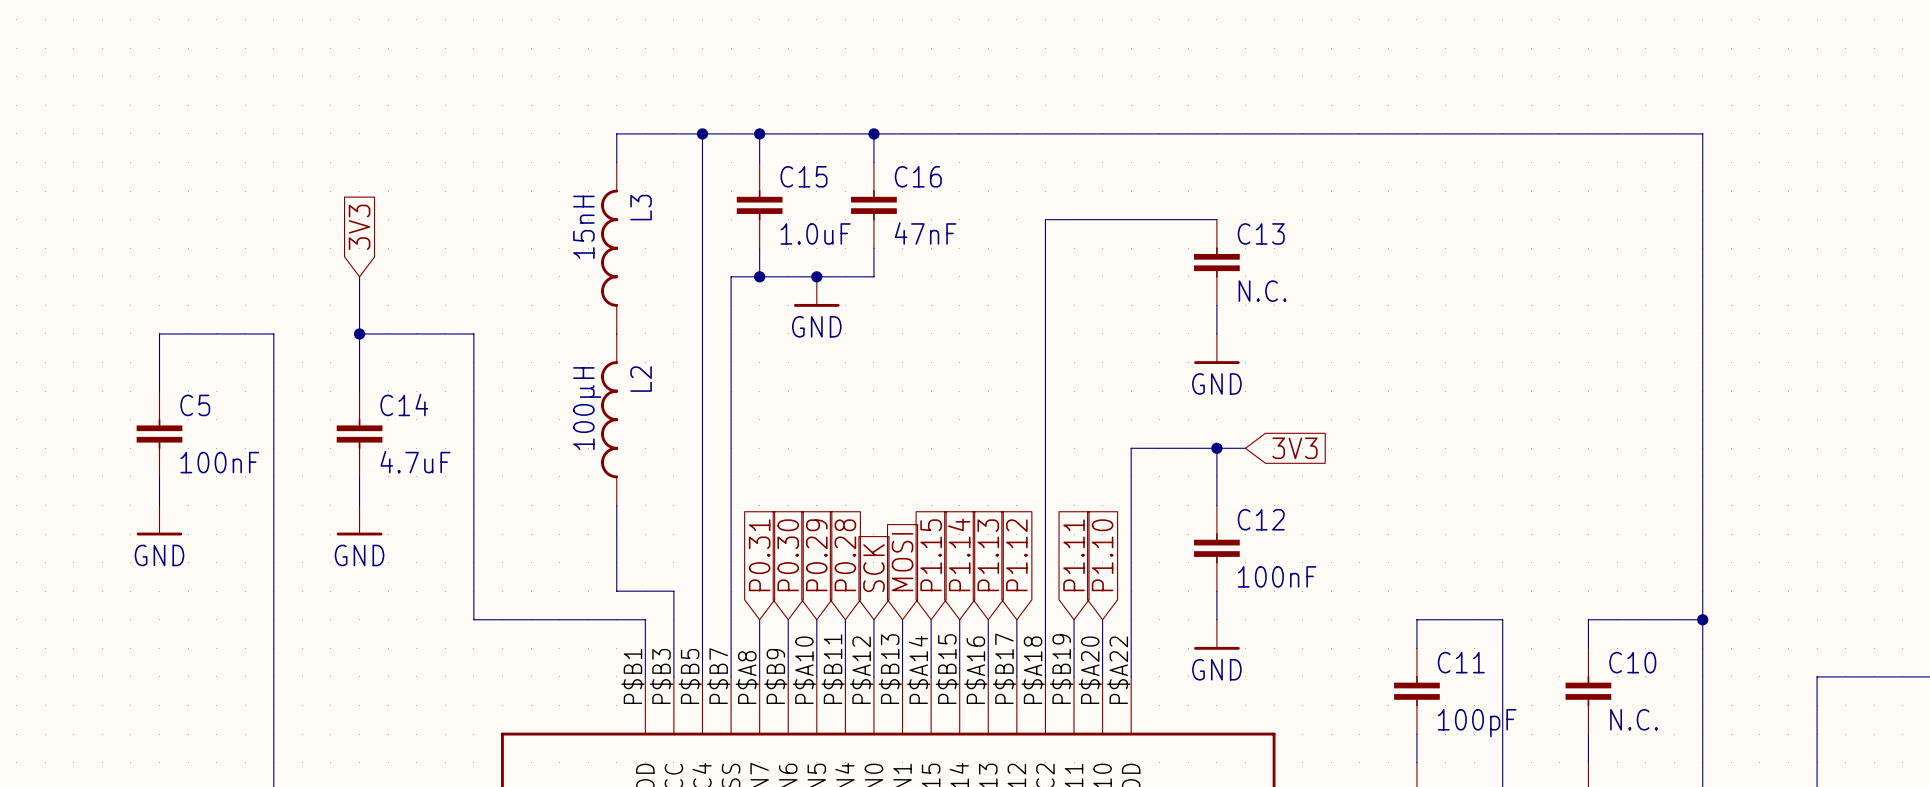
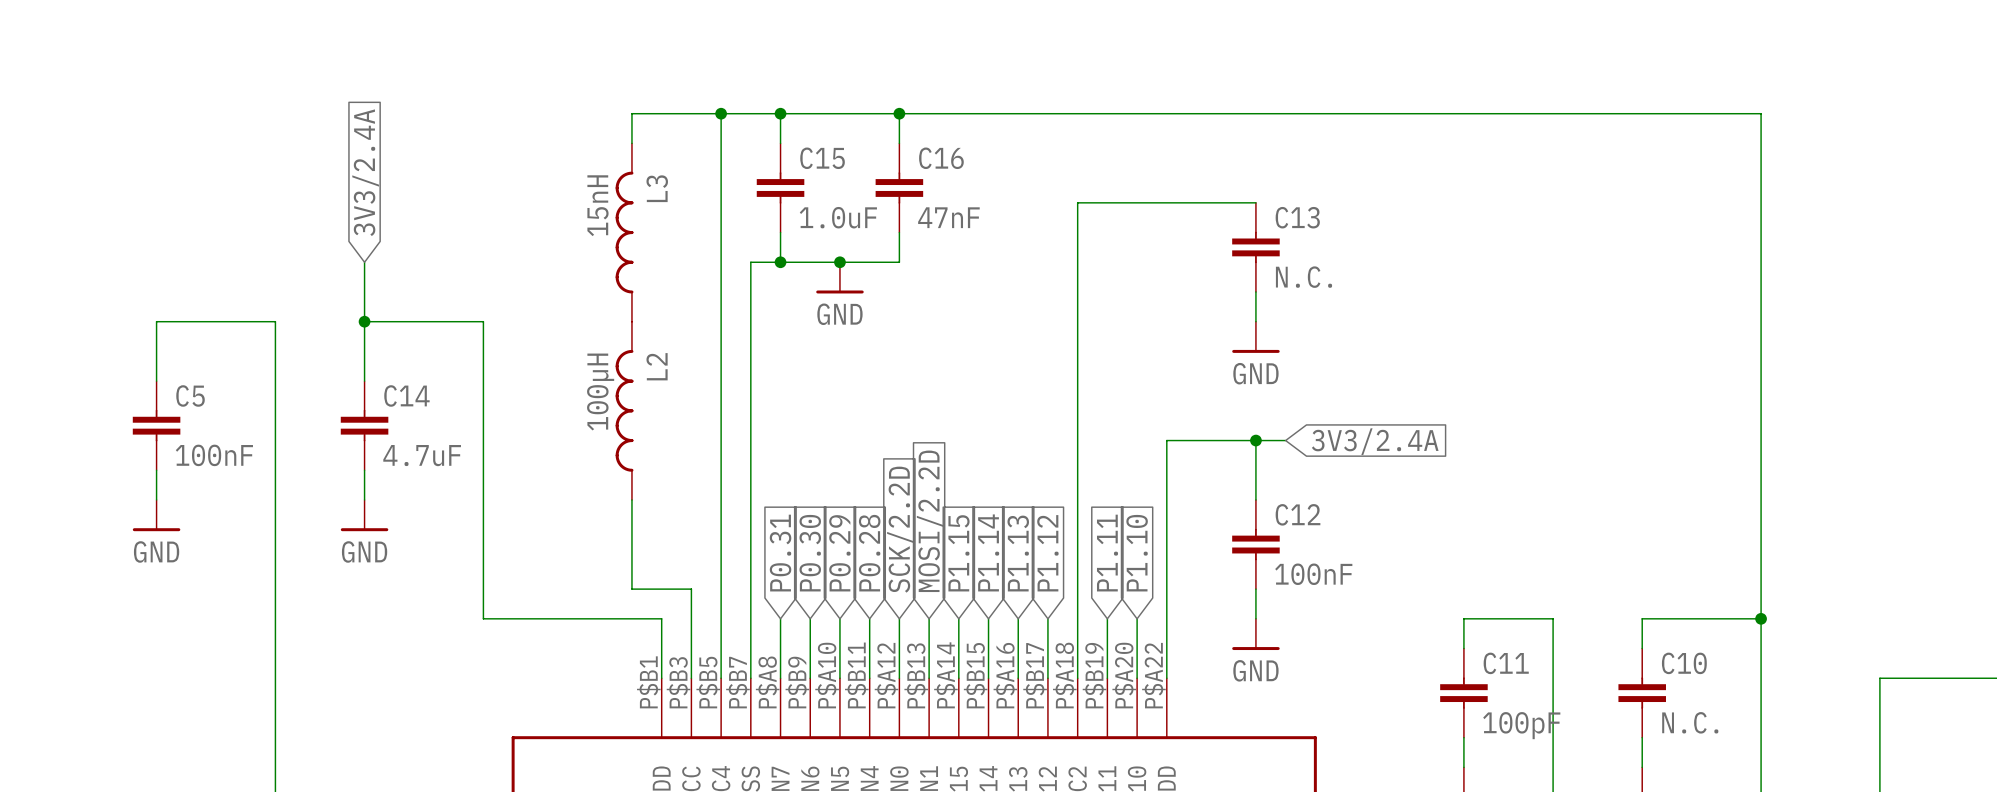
global label: 3V3 (359, 227) -> 3V3/2.4A (365, 172)
global label: 3V3 (1294, 448) -> 3V3/2.4A (1375, 441)
global label: MOSI (902, 562) -> MOSI/2.2D (930, 521)
global label: SCK (873, 568) -> SCK/2.2D (900, 529)

